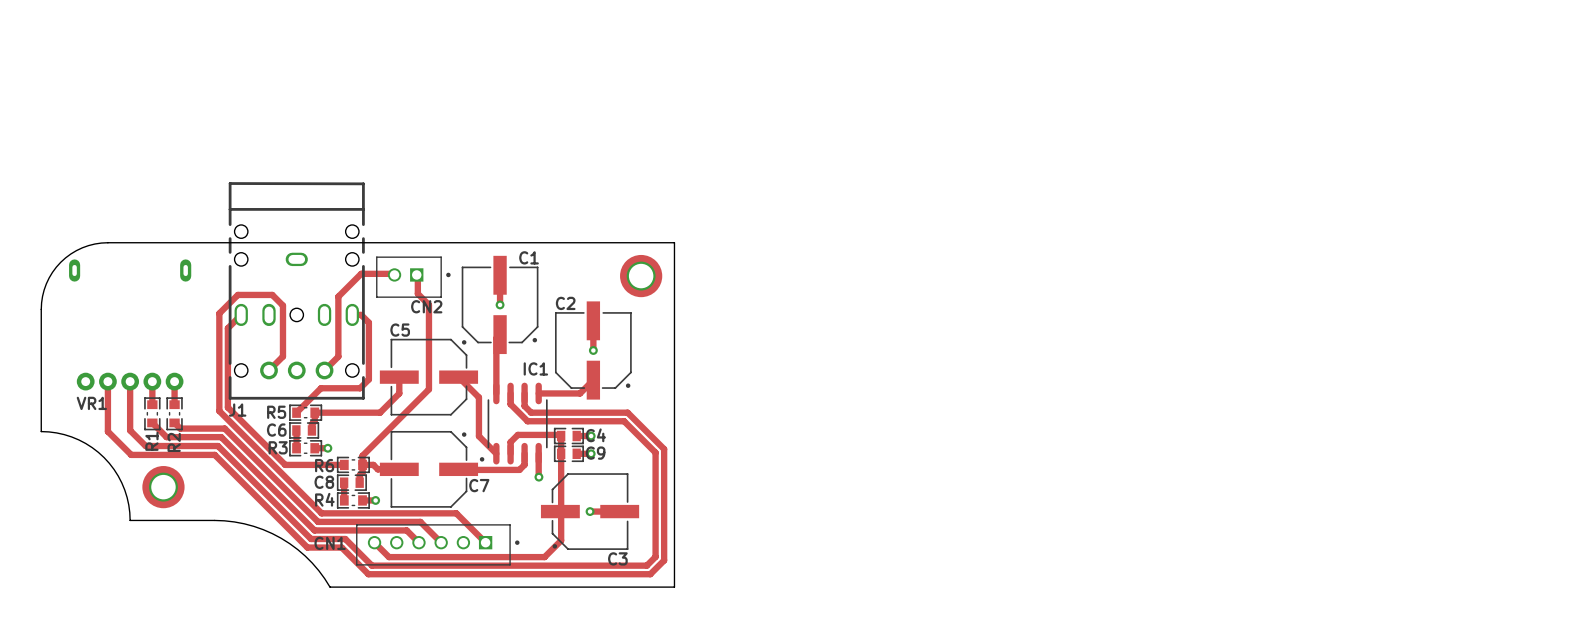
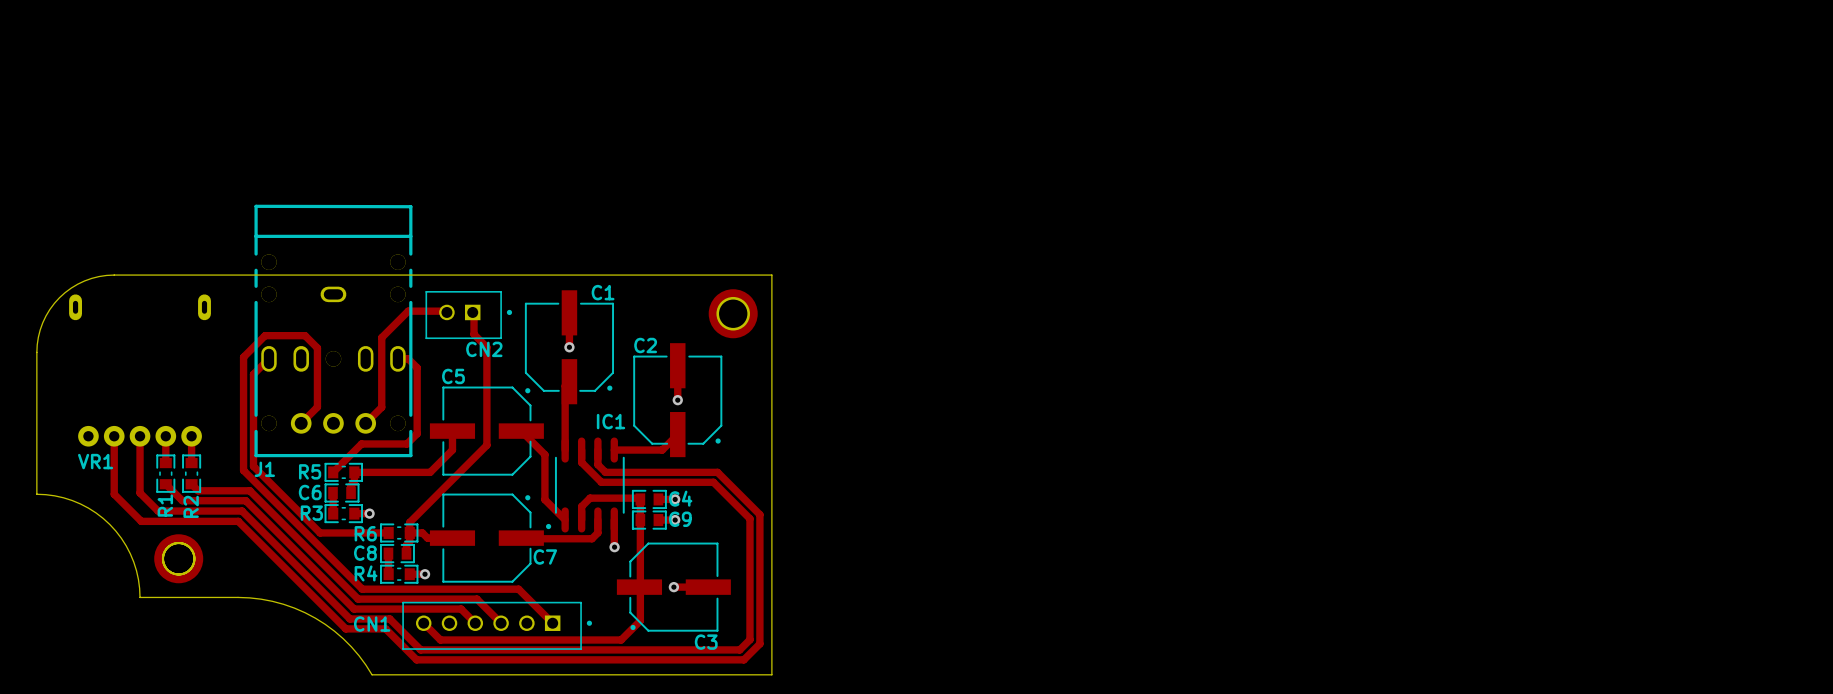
J1 footprint: [228, 182, 365, 400] -> [254, 204, 413, 458]
part: none -> (178, 558)

